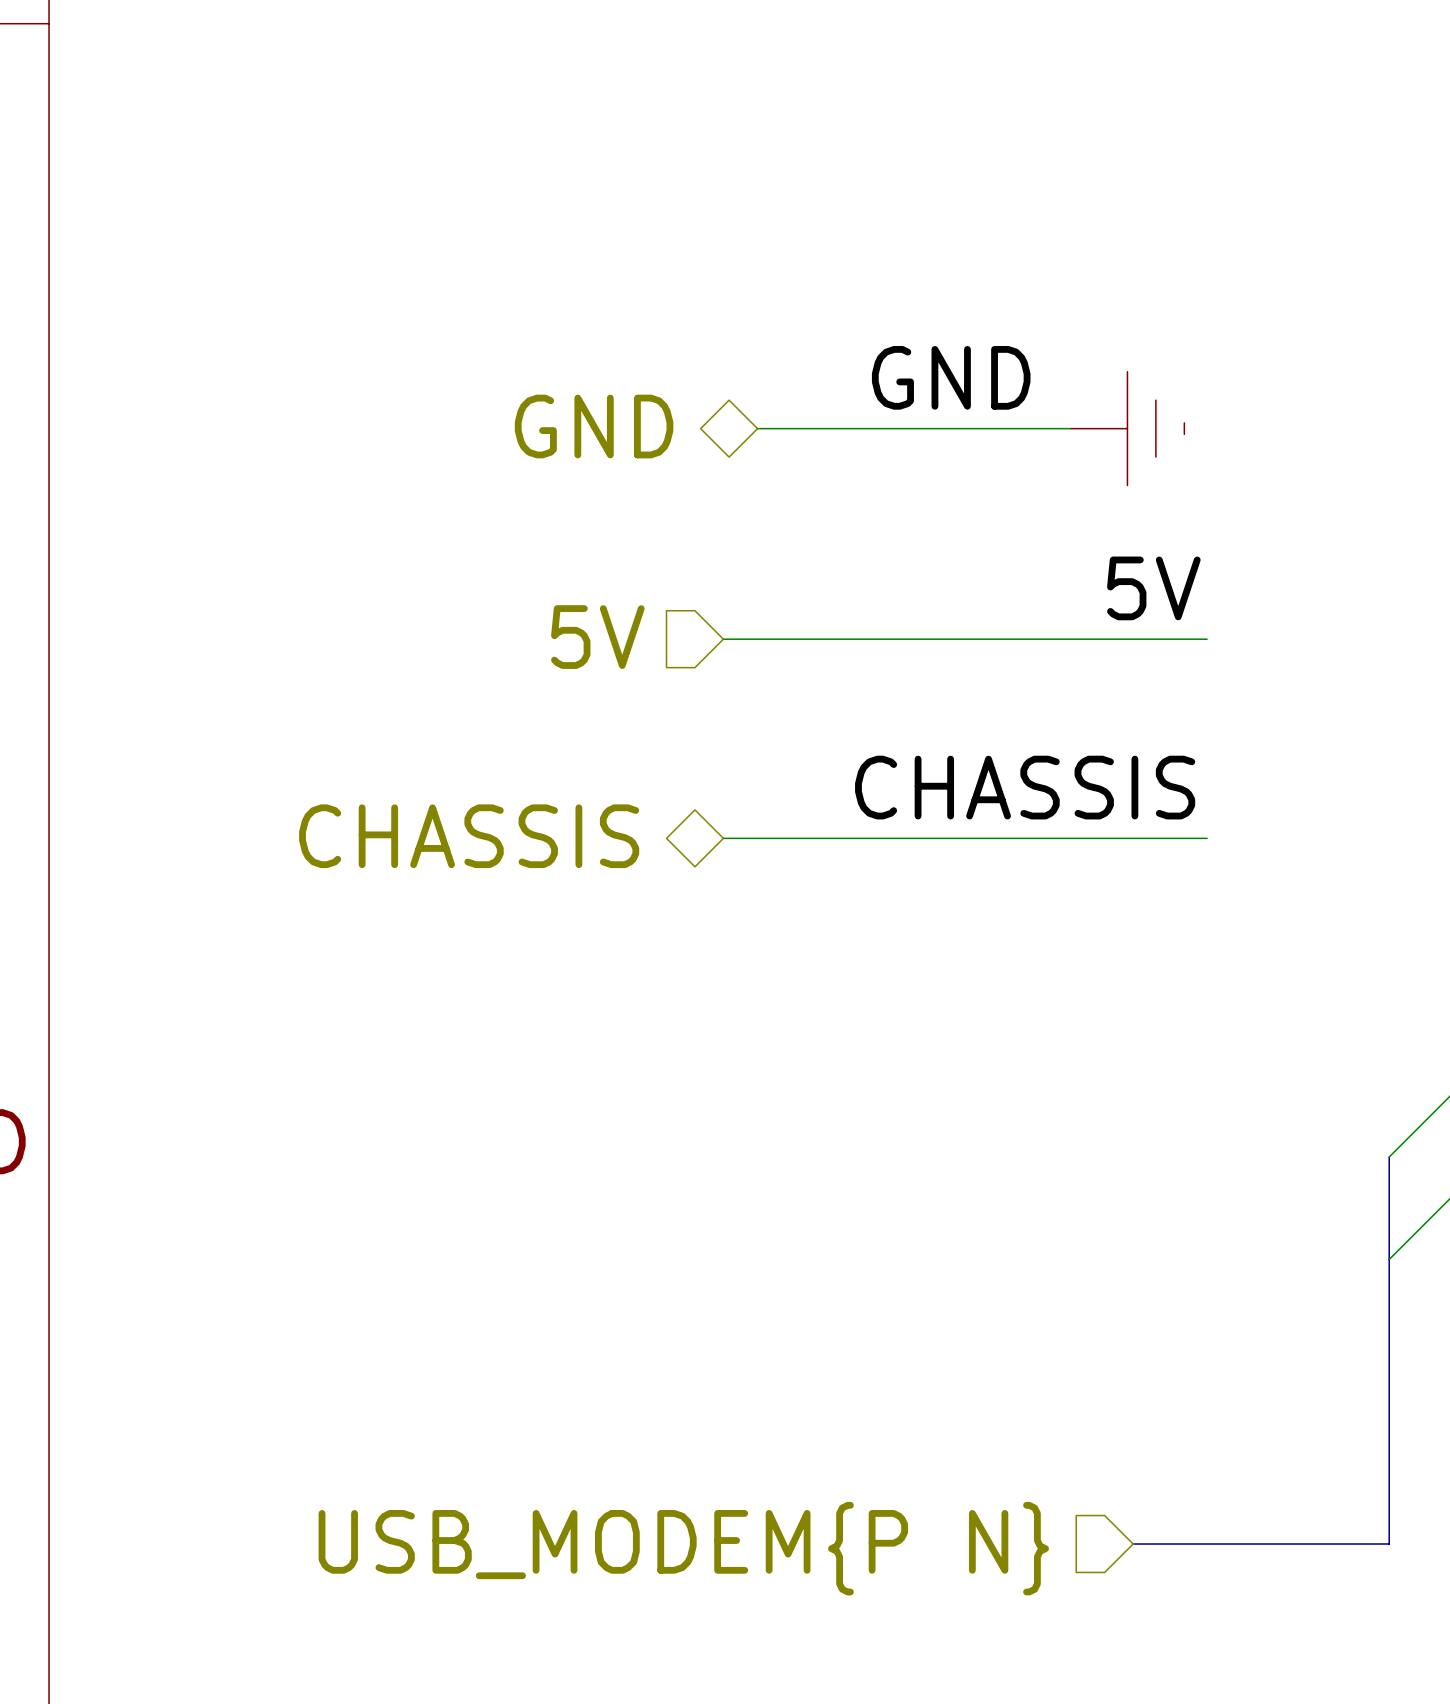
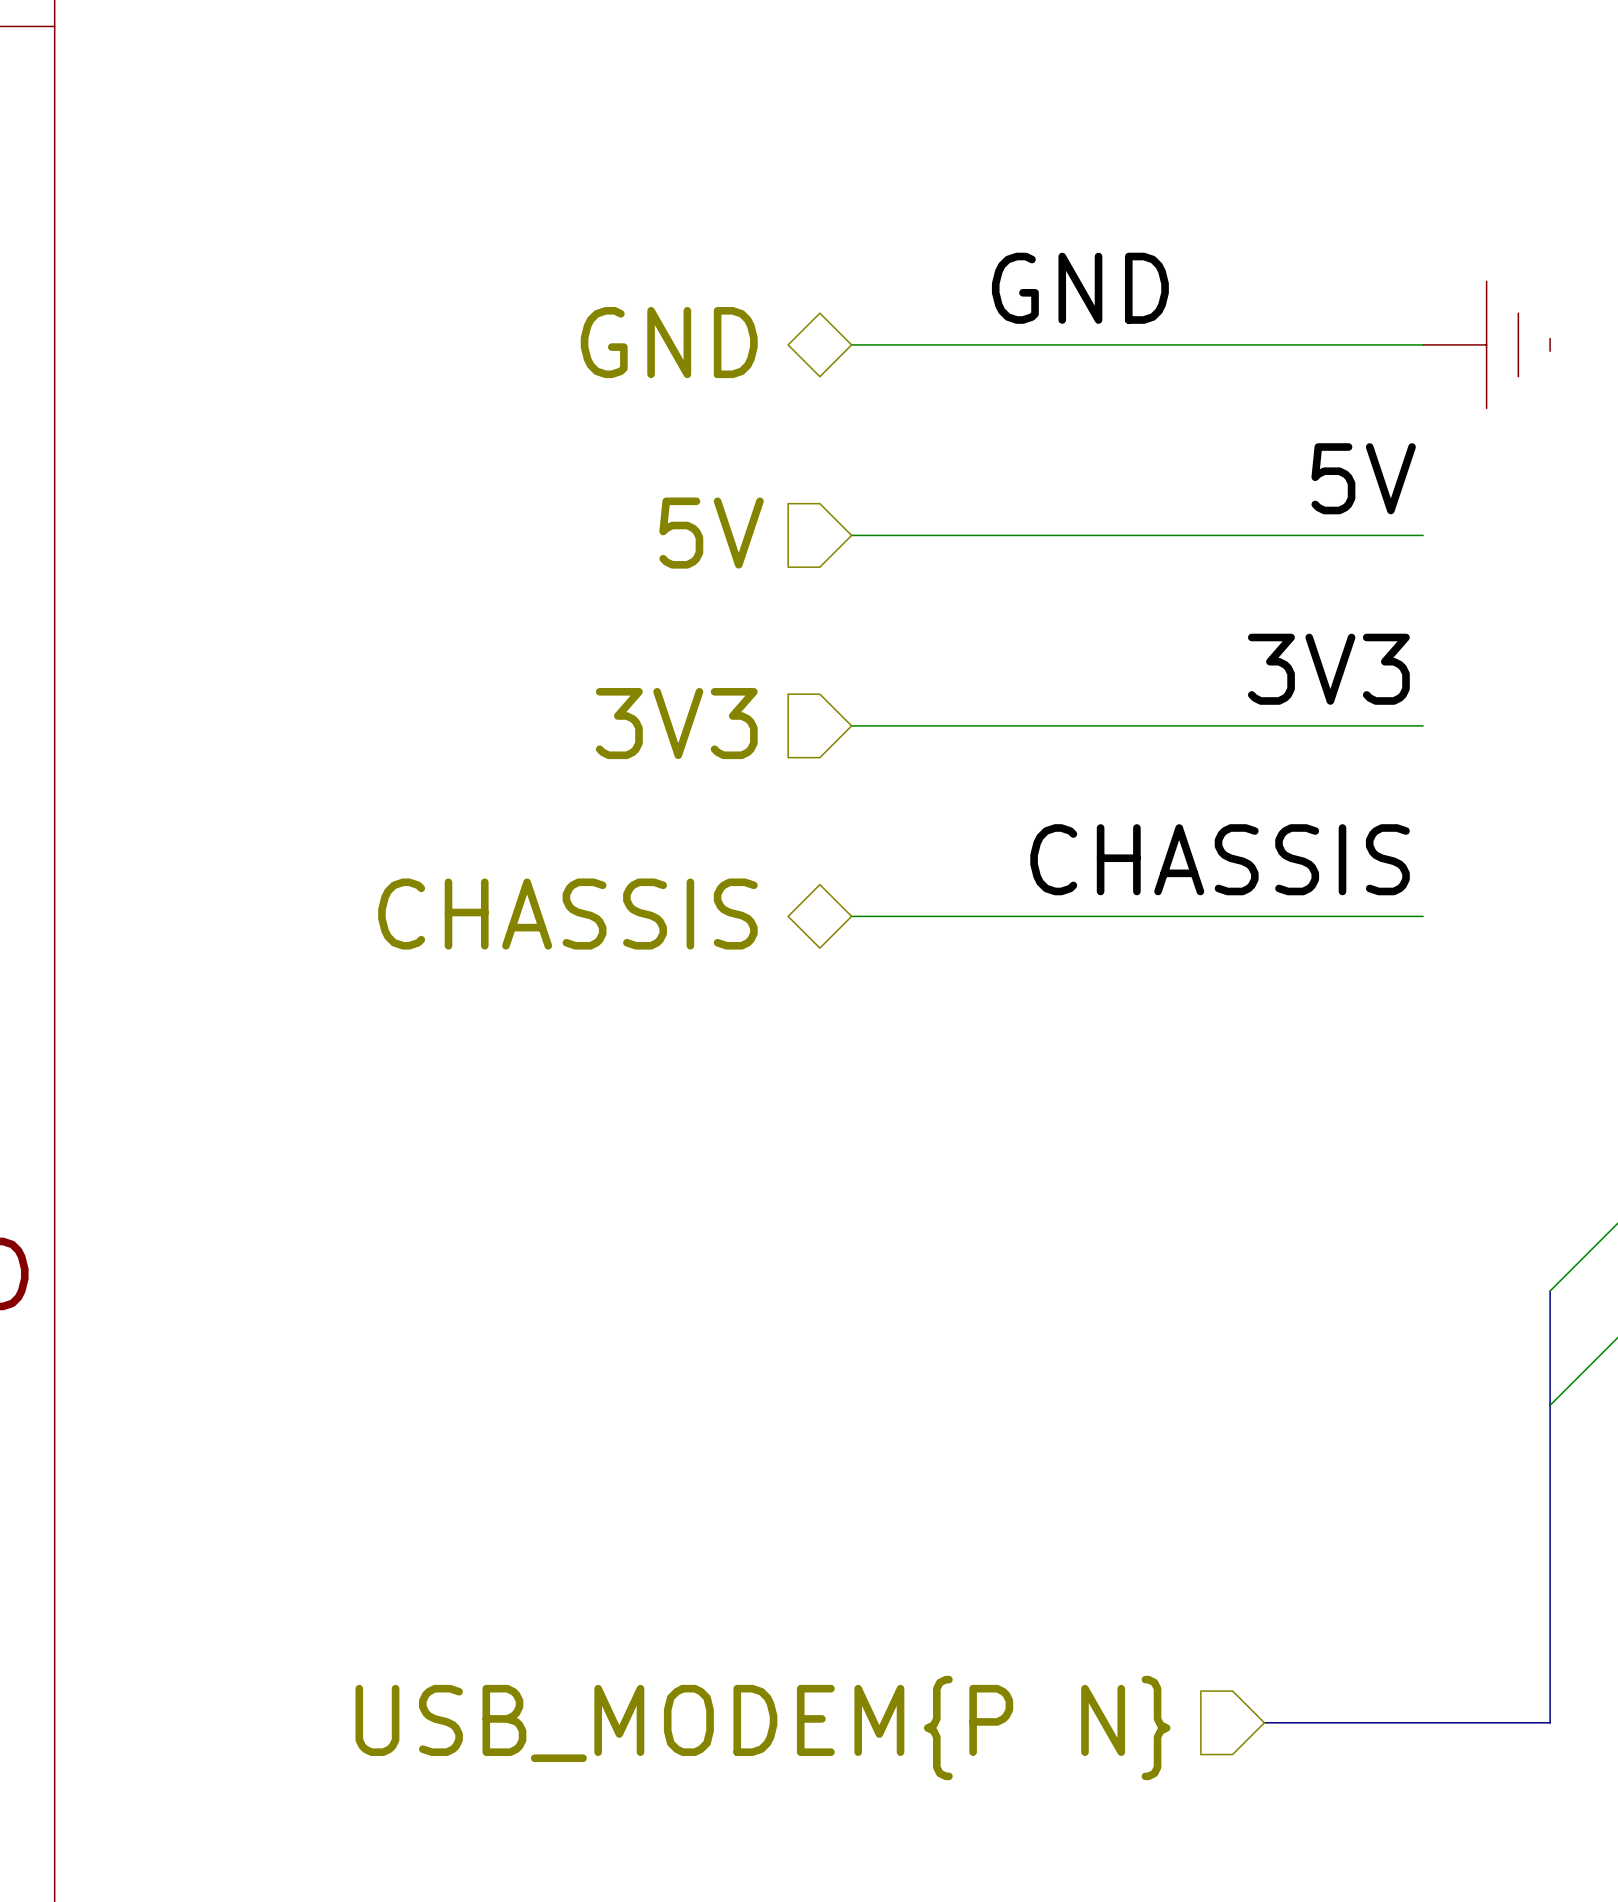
wire: none -> (851, 344) (1423, 344)
label position: GND (951, 377) -> GND (1080, 288)
hierarchical label position: GND (594, 426) -> GND (669, 342)
wire: (757, 428) (1070, 428) -> none
power symbol position: (1127, 428) -> (1486, 344)
wire: none -> (851, 535) (1423, 535)
label position: 5V (1153, 588) -> 5V (1363, 478)
label: none -> 3V3 (1328, 669)
hierarchical label position: 5V (597, 637) -> 5V (711, 533)
wire: (723, 639) (1207, 639) -> none
hierarchical label: none -> 3V3 (676, 723)
wire: none -> (851, 725) (1423, 725)
label position: CHASSIS (1025, 787) -> CHASSIS (1220, 859)
wire: none -> (851, 916) (1423, 916)
hierarchical label position: CHASSIS (469, 836) -> CHASSIS (567, 914)
wire: (723, 838) (1207, 838) -> none

